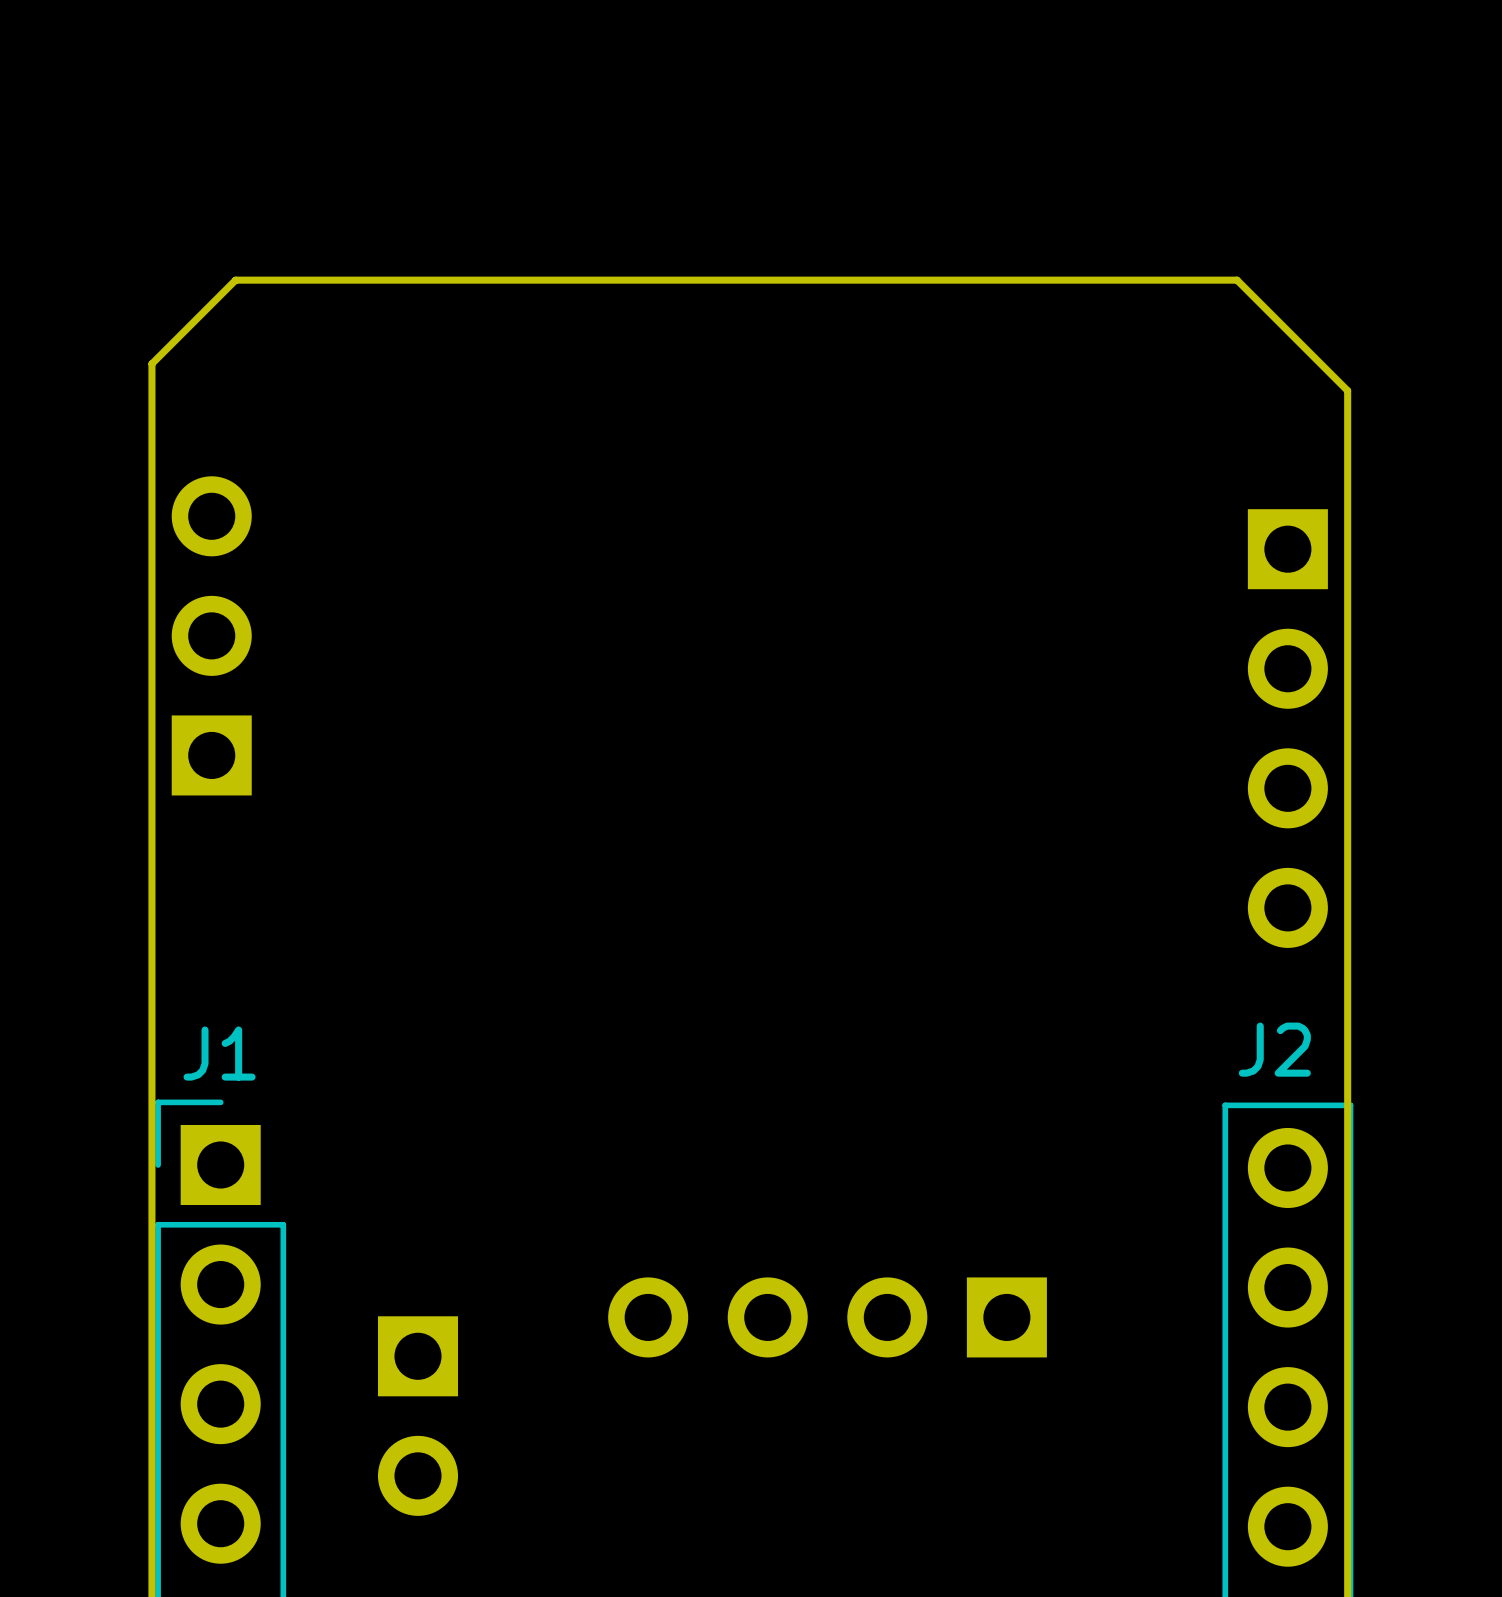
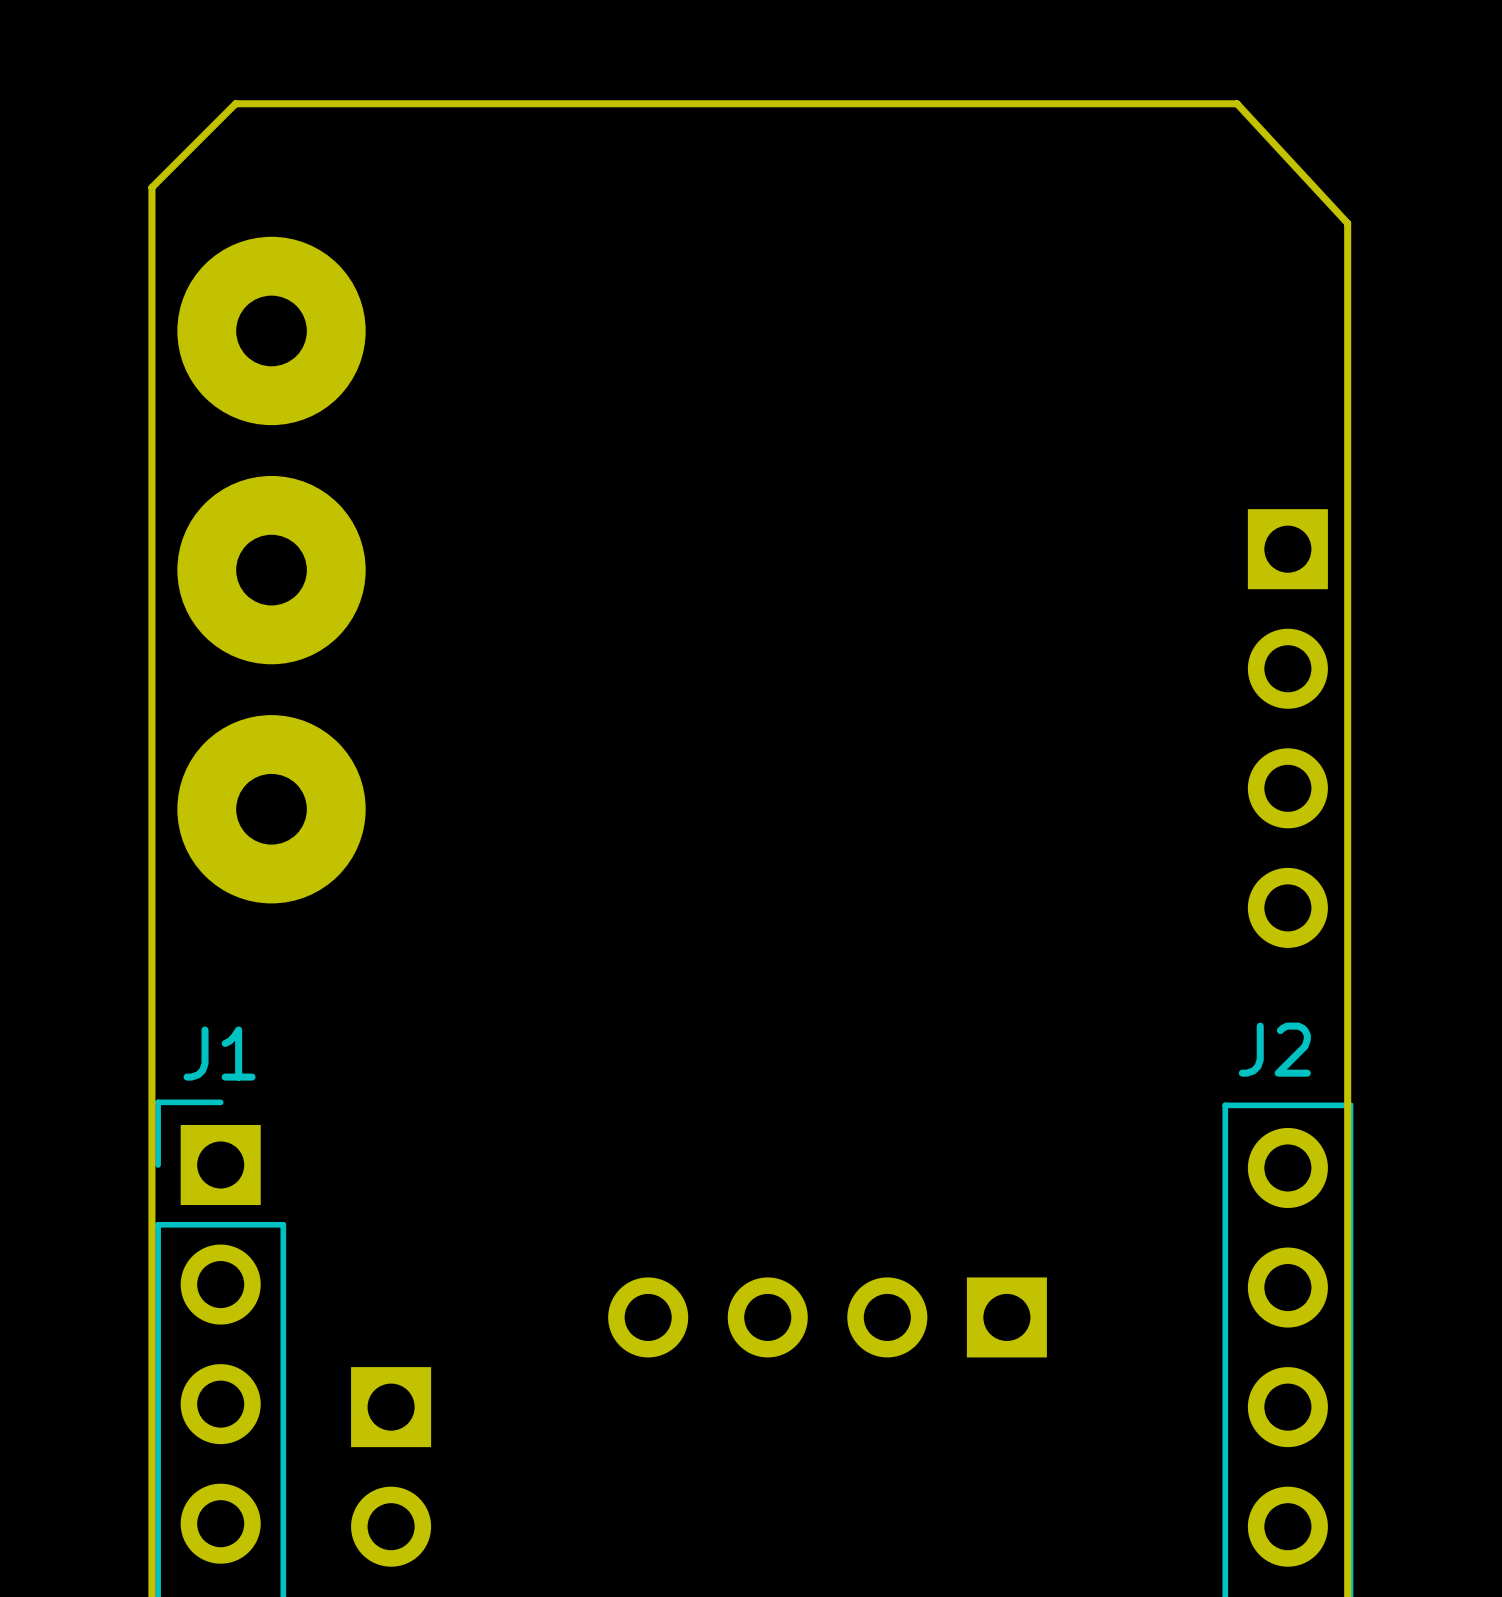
part: none -> (271, 330)
board edge: (151, 363) (235, 280) (1237, 280) (1347, 390) -> (151, 363) (151, 187) (235, 103) (1237, 103) (1347, 223) (1347, 390)
part: none -> (271, 570)
part: (211, 635) -> none
part: none -> (271, 809)
part position: (417, 1416) -> (391, 1466)

